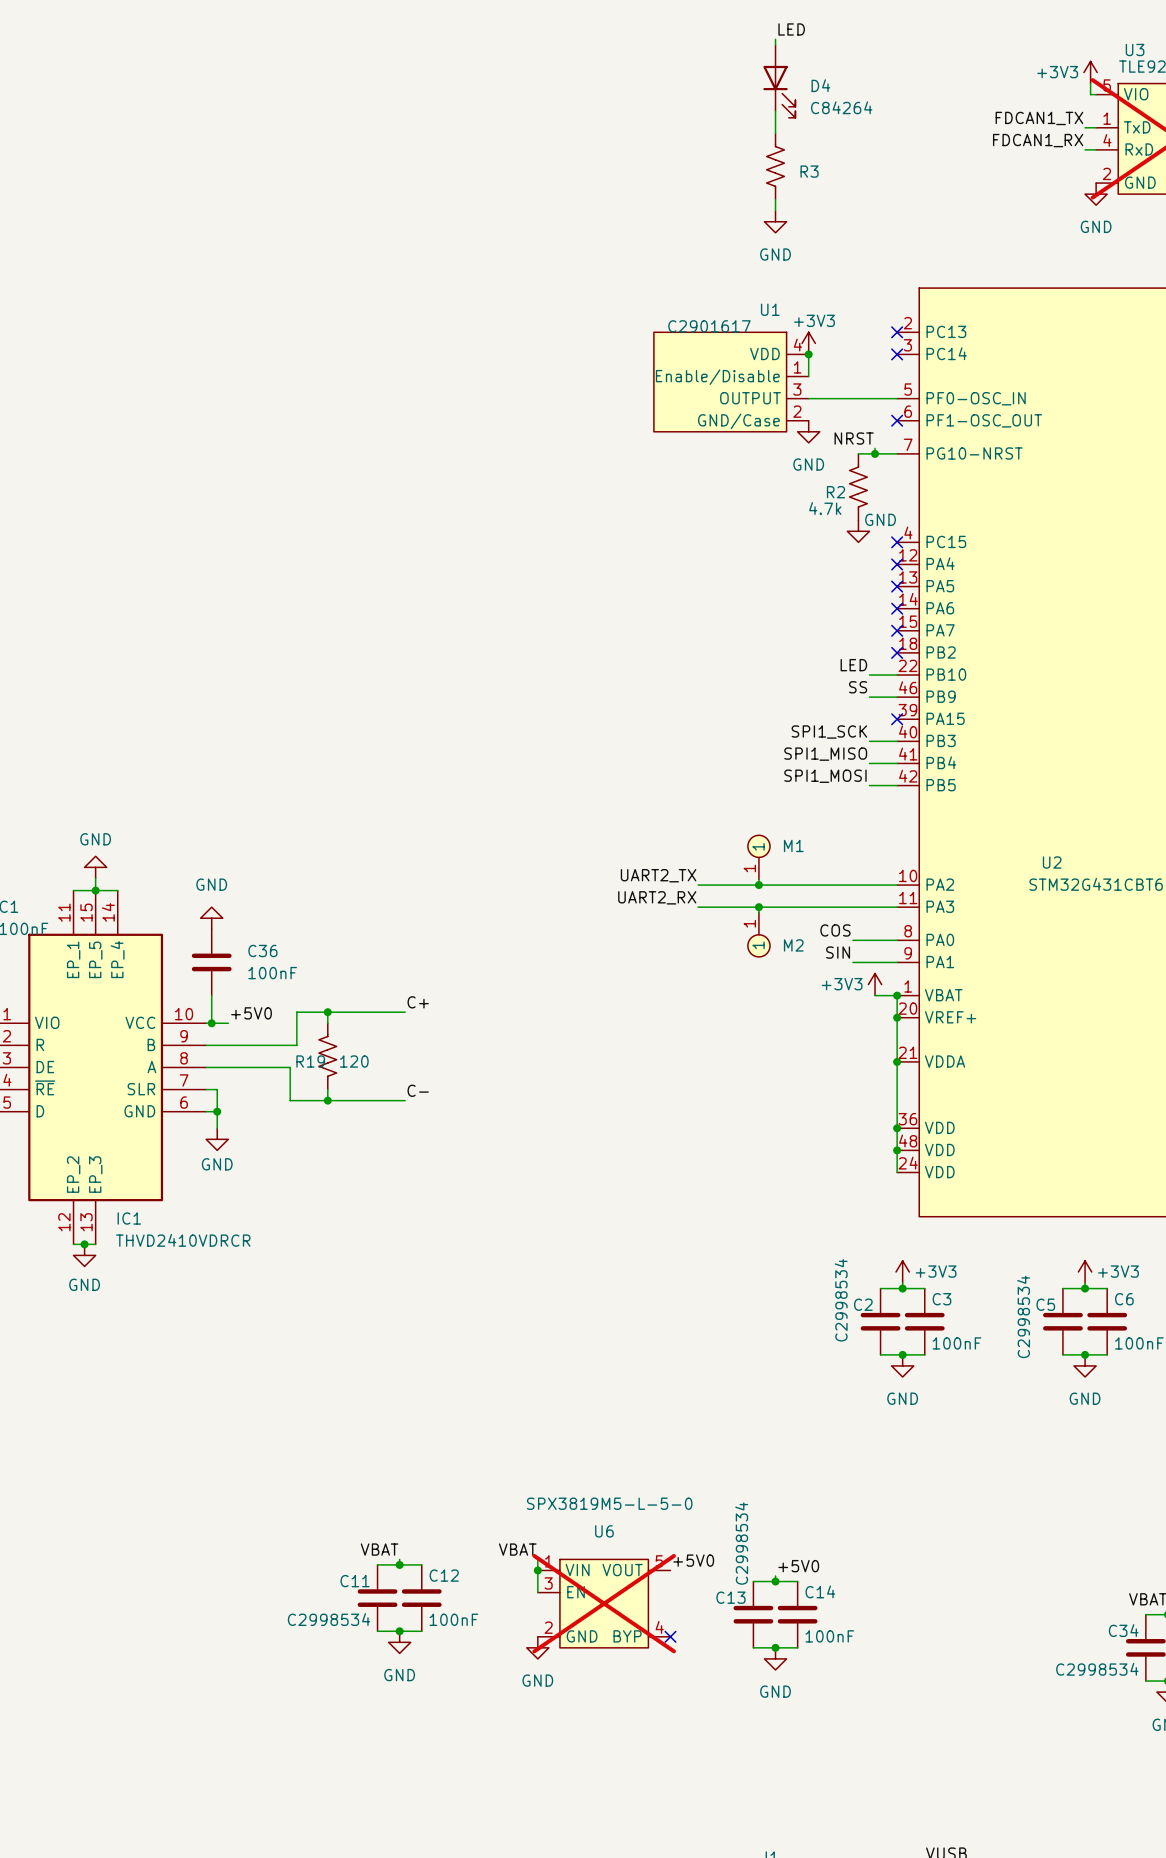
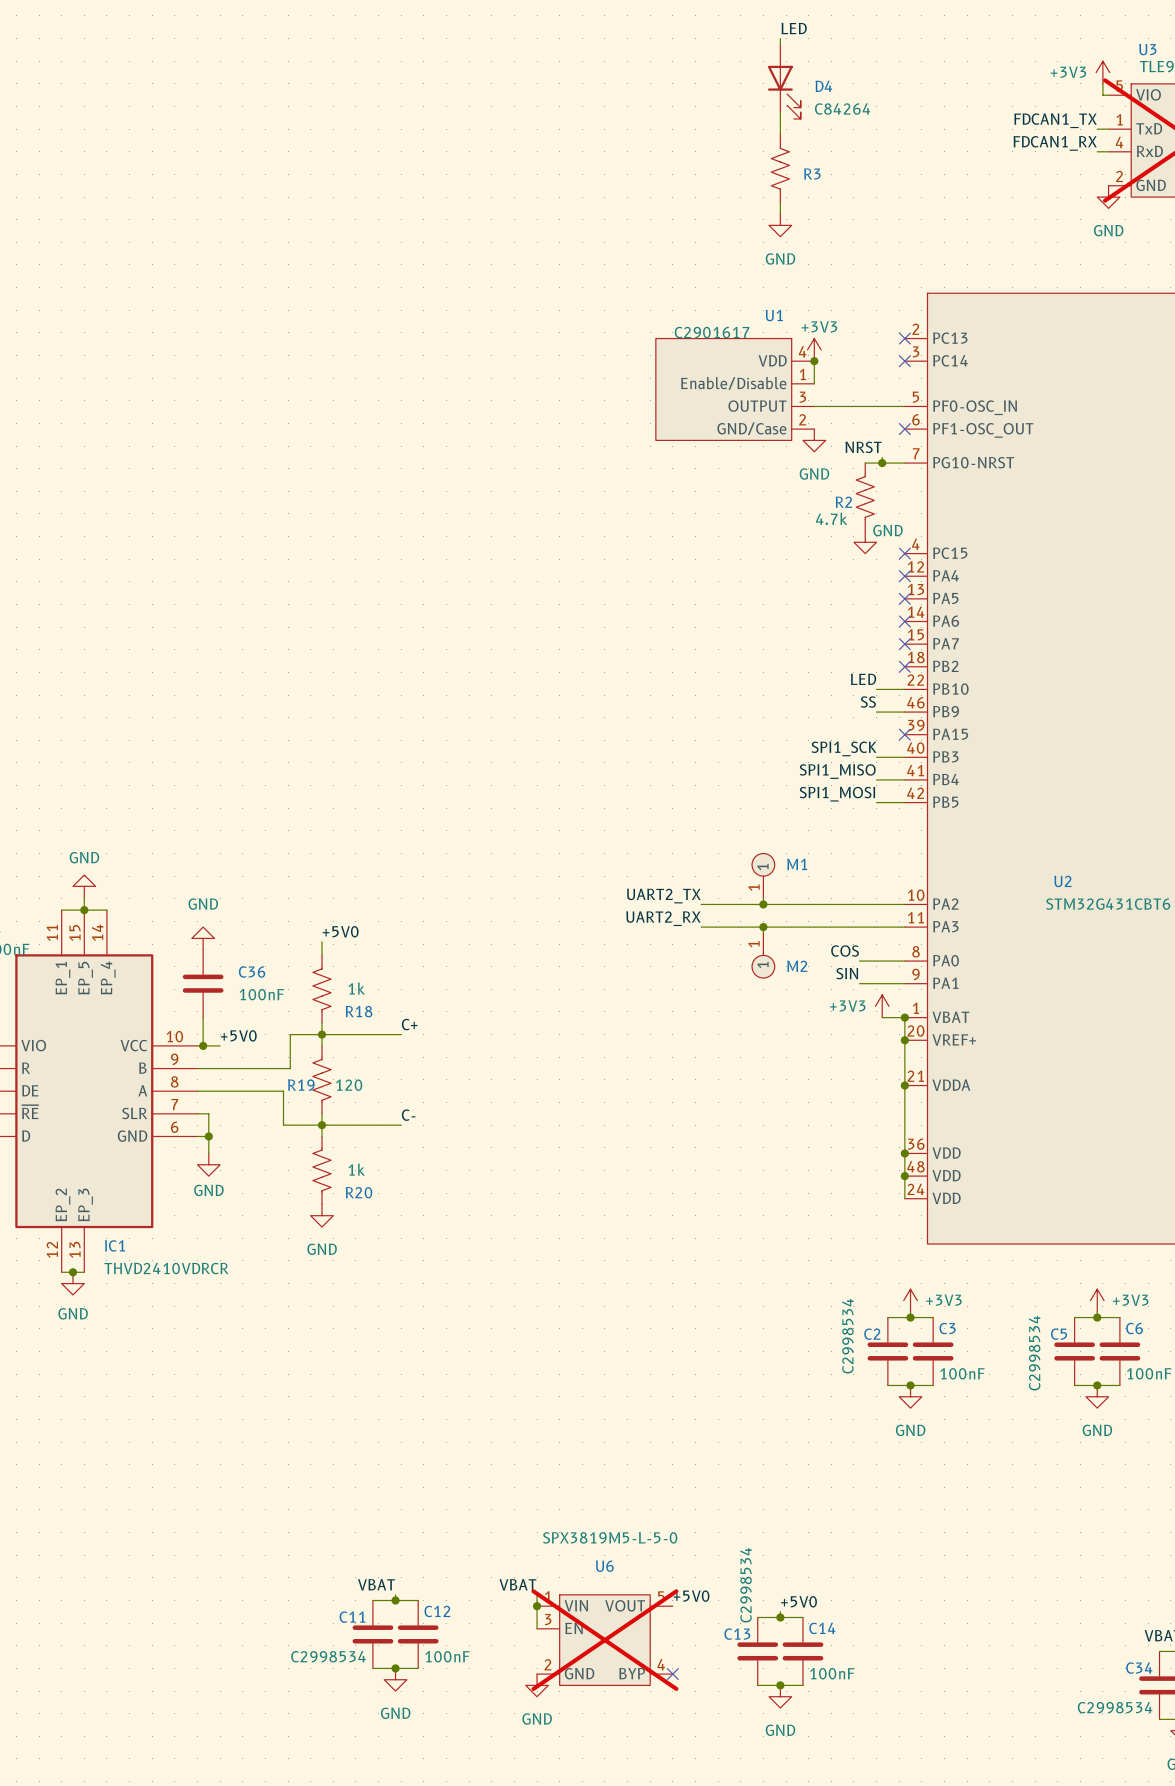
label: none -> +5V0 (340, 931)
wire: none -> (321, 941) (321, 955)
R18: none -> 1k (321, 989)
wire: none -> (321, 1023) (321, 1034)
wire: none -> (321, 1125) (321, 1136)
R20: none -> 1k (321, 1170)
power symbol: none -> GND (321, 1215)

